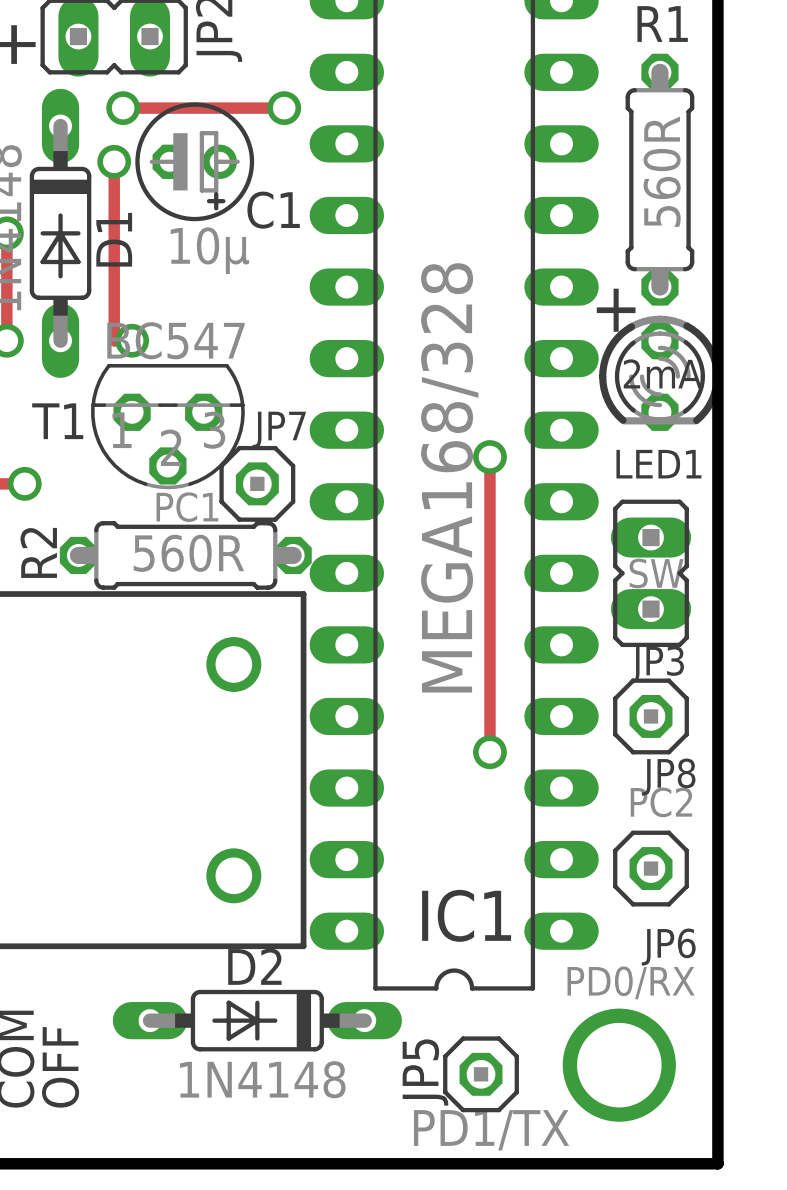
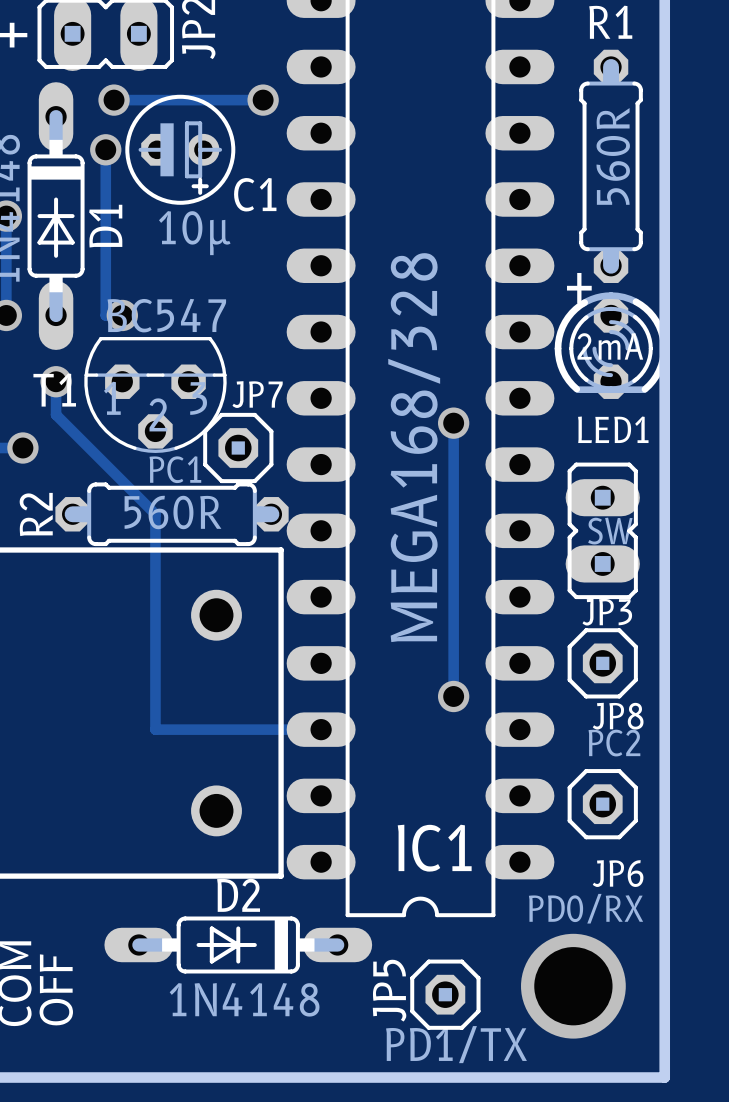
track: none -> (56, 381) (56, 414) (155, 514) (155, 729) (321, 729)
via: none -> (56, 381)

